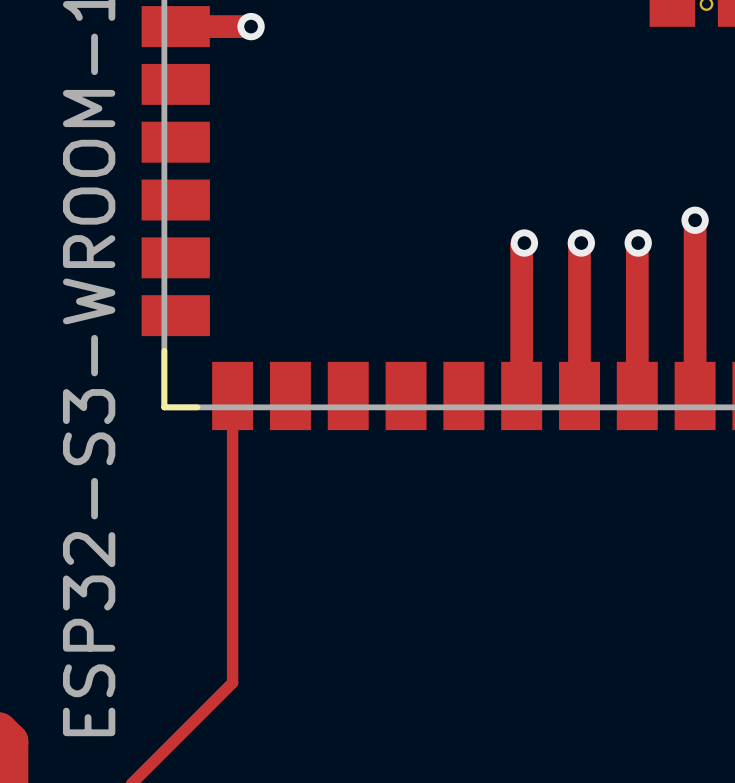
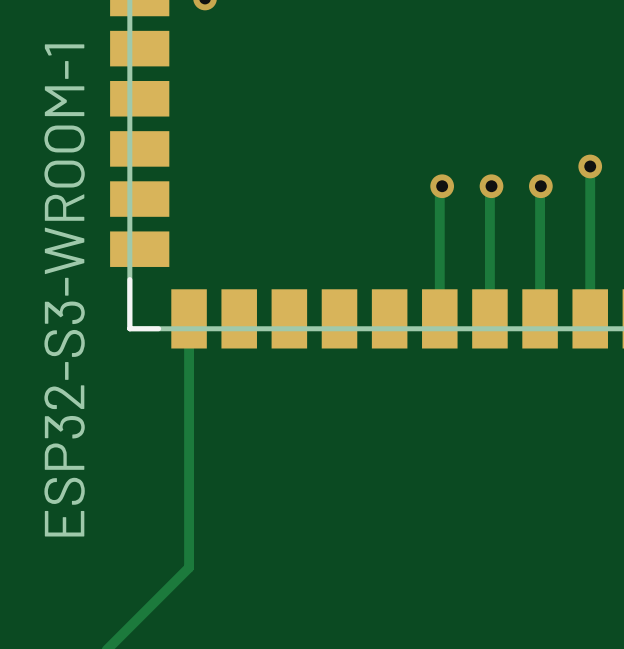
track width: thick (695, 220) (695, 395) -> thin (590, 166) (590, 318)
track width: thick (524, 243) (521, 245) (521, 395) -> thin (442, 186) (439, 188) (439, 318)
track width: thick (581, 243) (579, 244) (579, 395) -> thin (491, 186) (489, 187) (489, 318)
track width: thick (638, 243) (637, 395) -> thin (540, 186) (540, 318)

